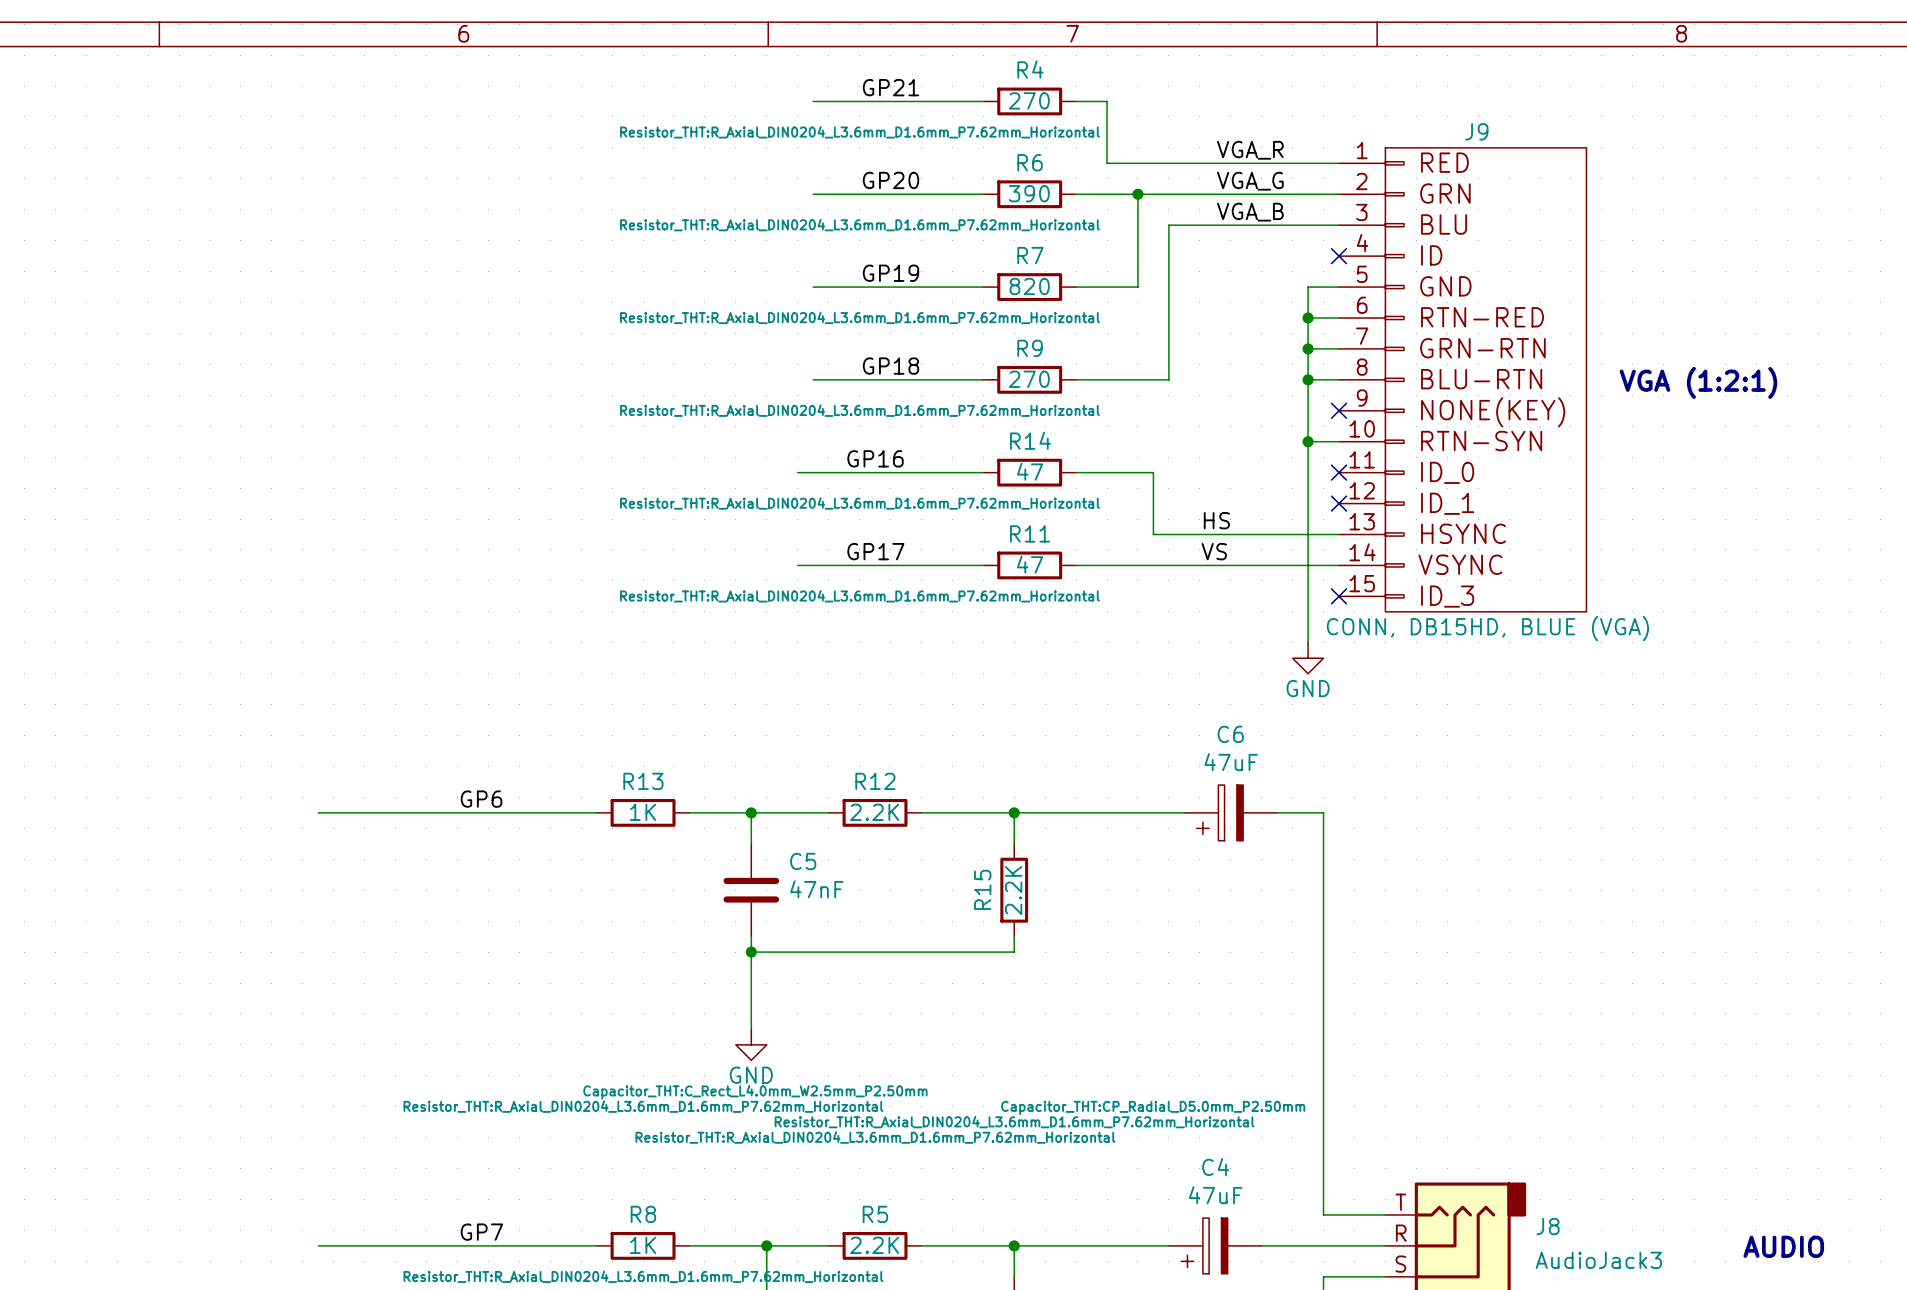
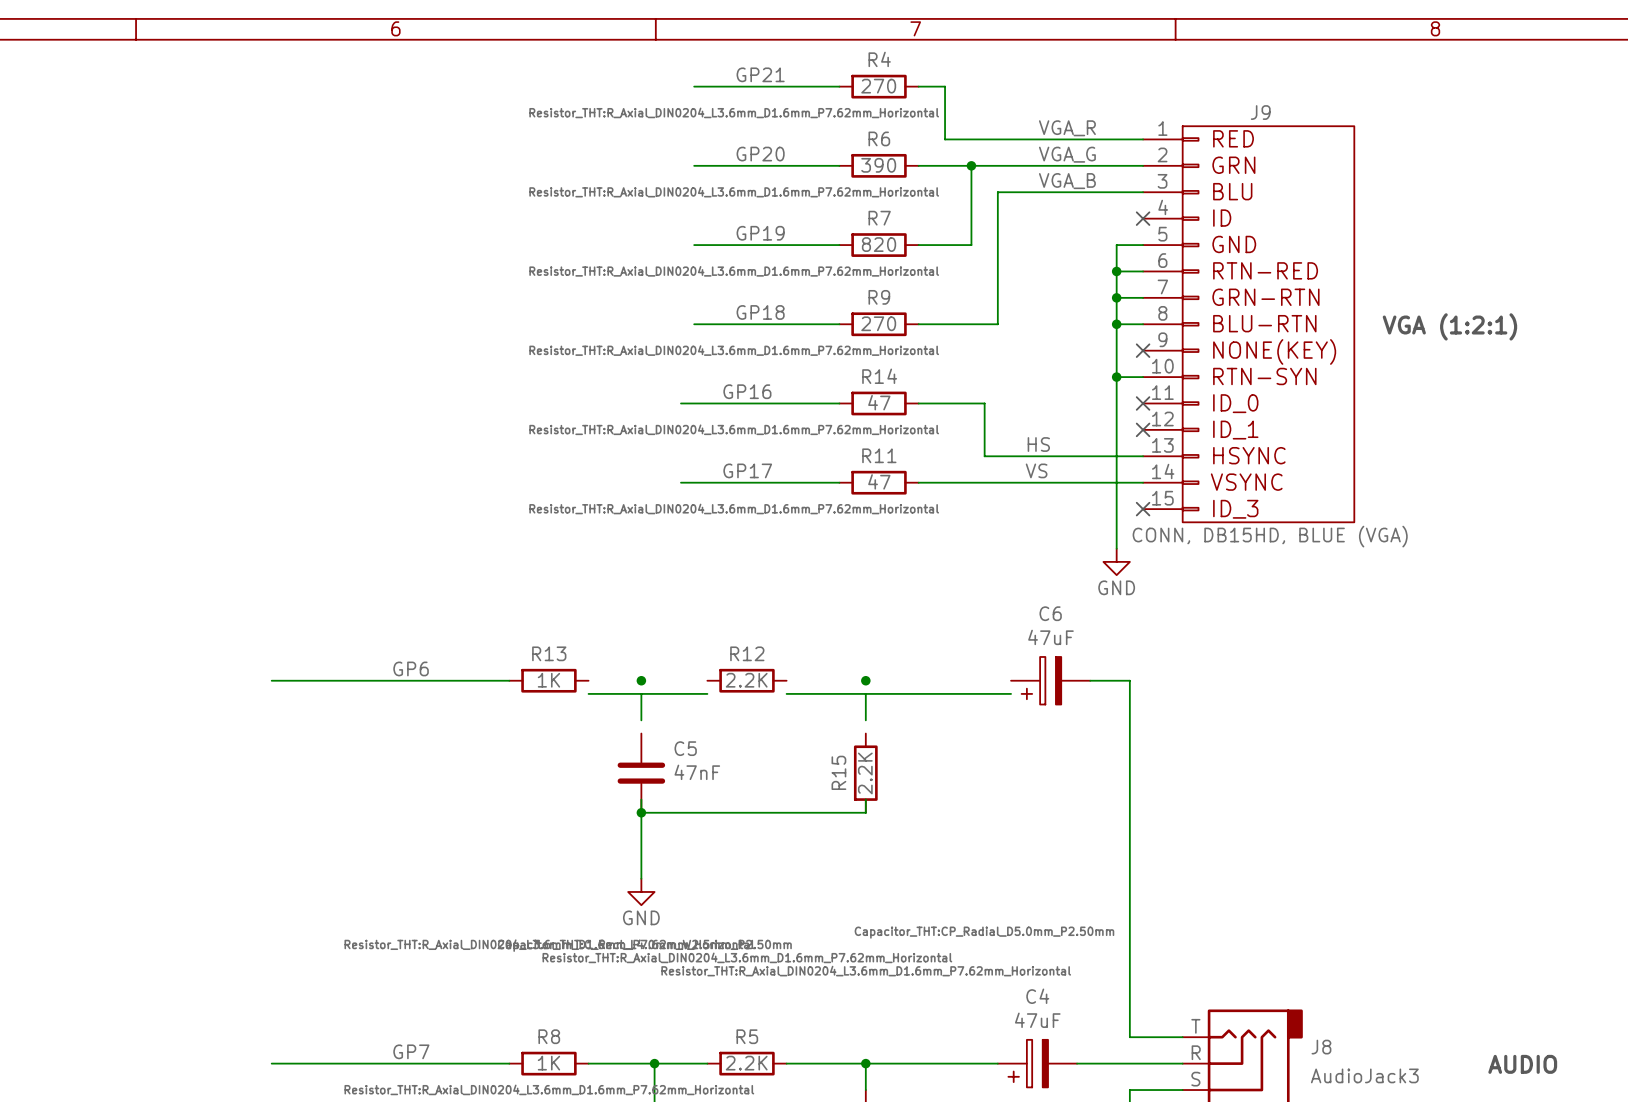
label position: GP6 (481, 799) -> GP6 (411, 668)
wire: (318, 812) (596, 812) -> (271, 680) (509, 680)
R13 position: (643, 812) -> (548, 680)
junction position: (751, 812) -> (641, 680)
R12 position: (875, 812) -> (746, 680)
junction position: (1014, 812) -> (865, 680)
C6 position: (1230, 812) -> (1050, 680)
wire: (1277, 812) (1323, 812) -> (1090, 680) (1129, 680) (1129, 693)
C5 position: (751, 890) -> (641, 773)
R15 position: (1014, 890) -> (865, 773)

